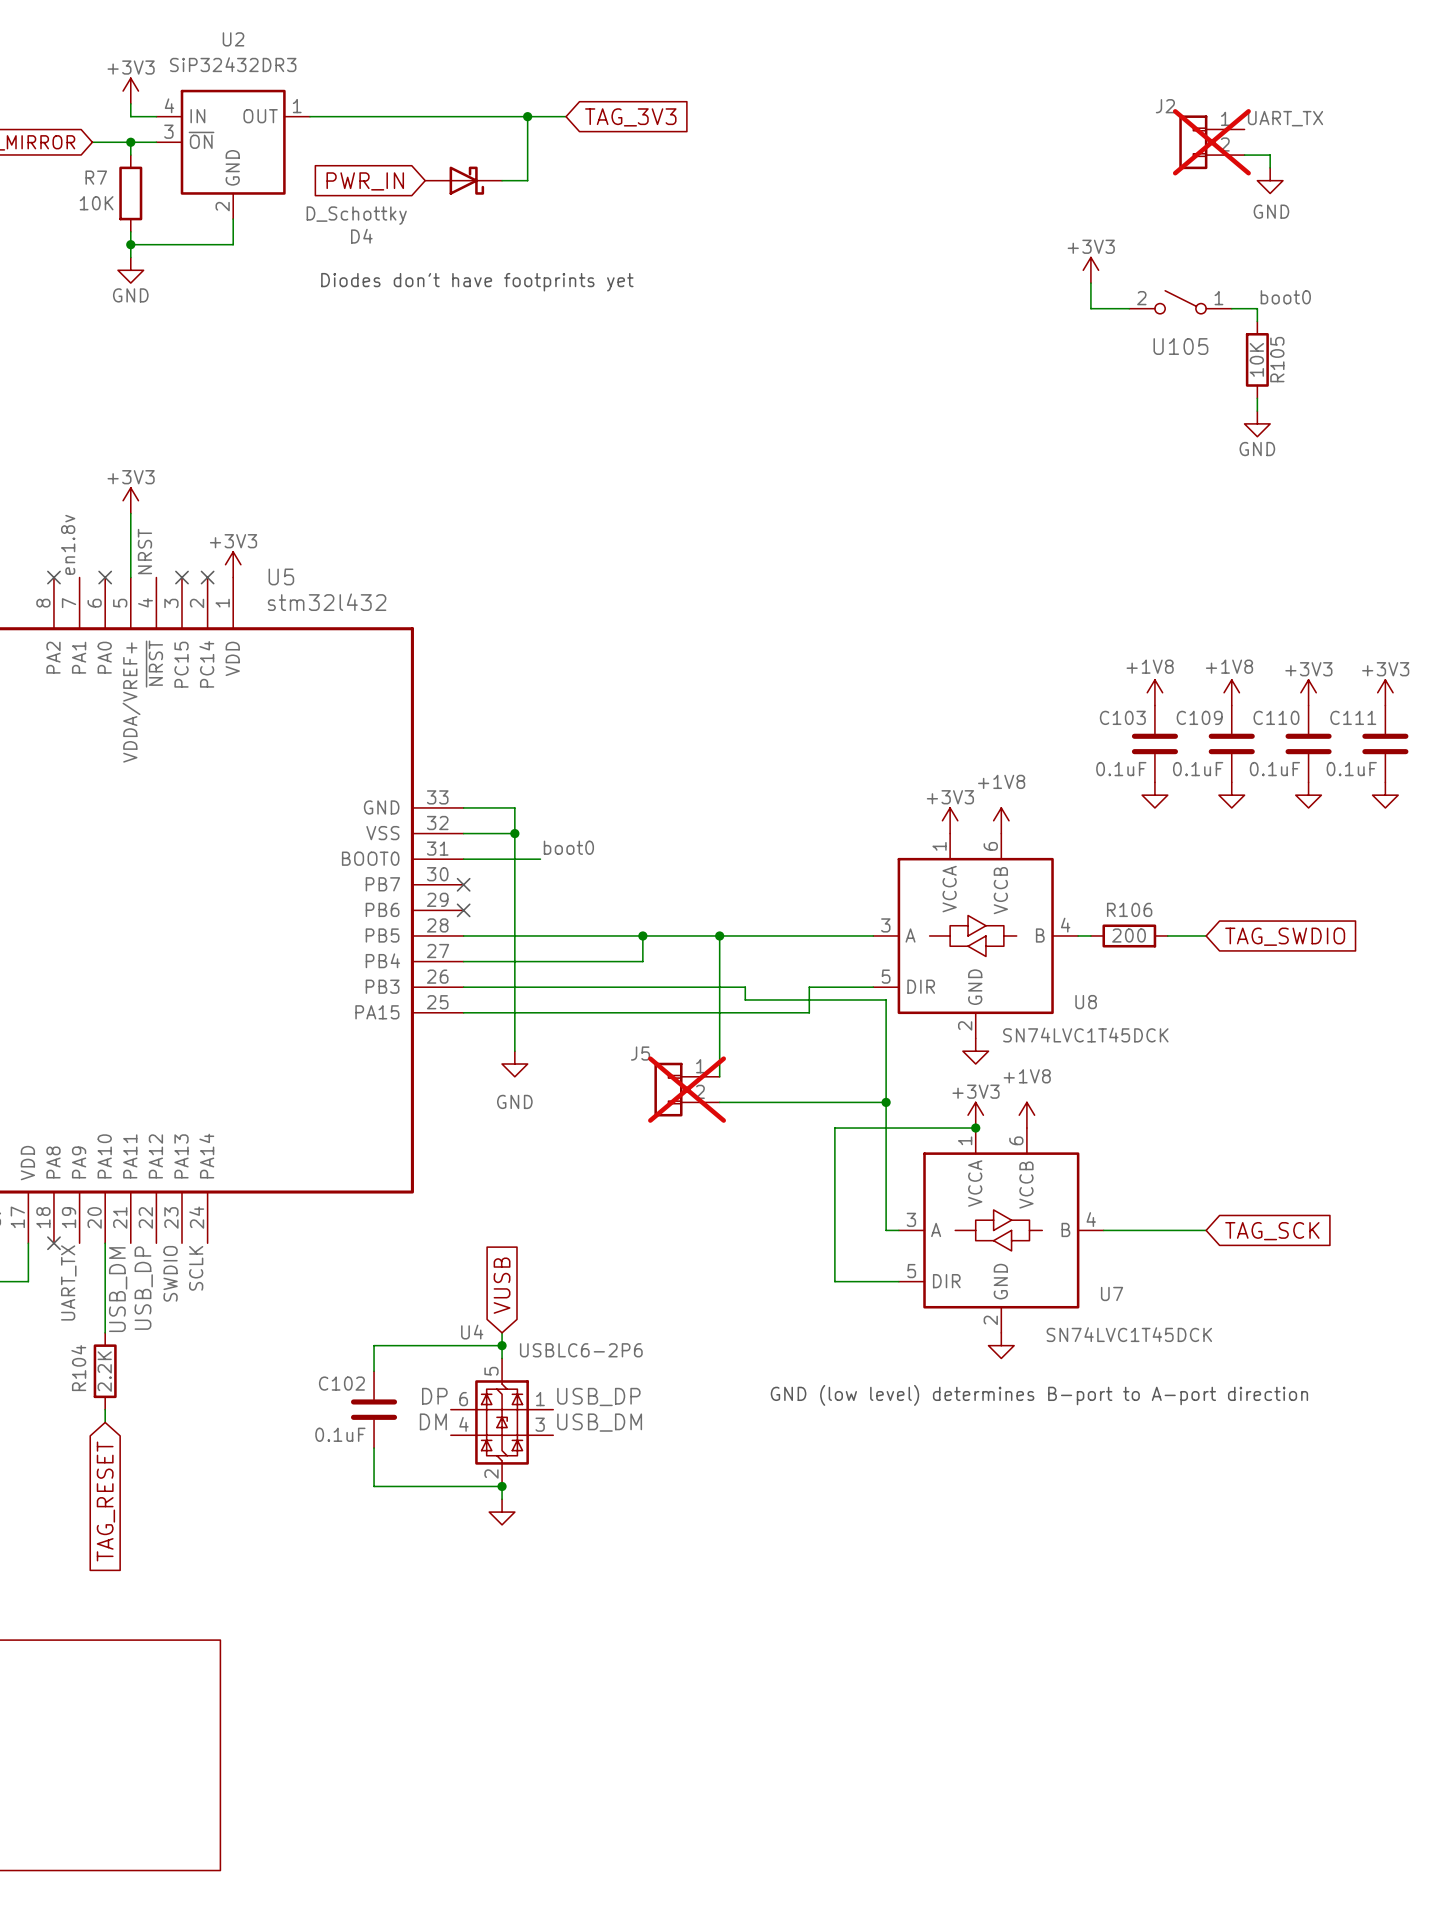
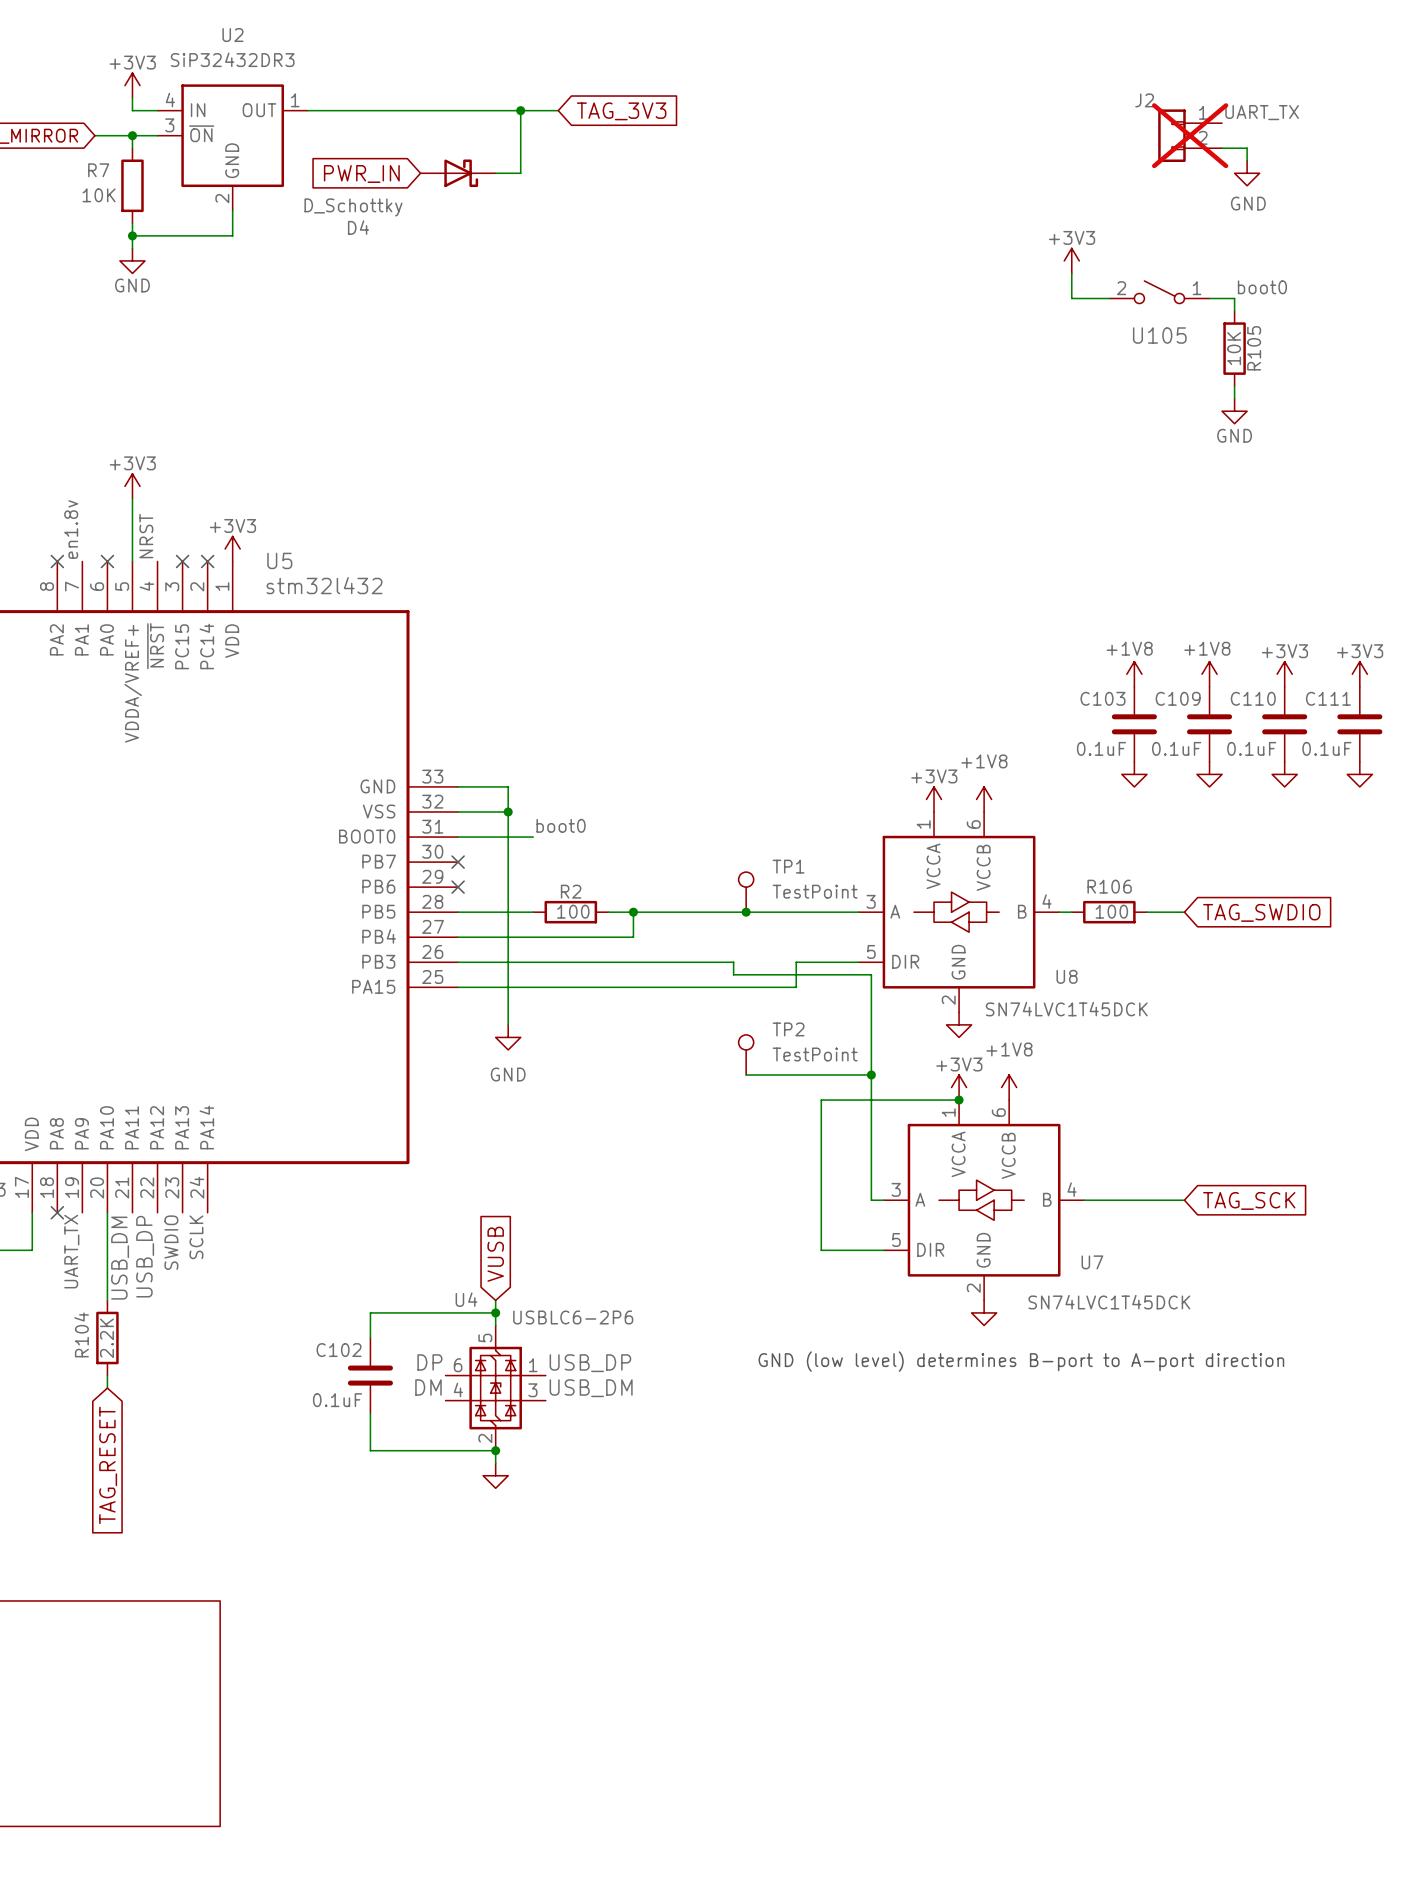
text: Diodes don't have footprints yet (477, 282) -> none
TP1: none -> TestPoint (746, 892)
wire: (540, 935) (617, 935) -> none
R2: none -> 100 (570, 912)
wire: (719, 935) (719, 1076) -> none
junction position: (719, 935) -> (746, 912)
R106 value: 200 (1129, 935) -> 100 (1111, 911)
TP2: none -> TestPoint (746, 1054)
J5: (687, 1089) -> none
wire: (719, 1102) (758, 1102) -> none

